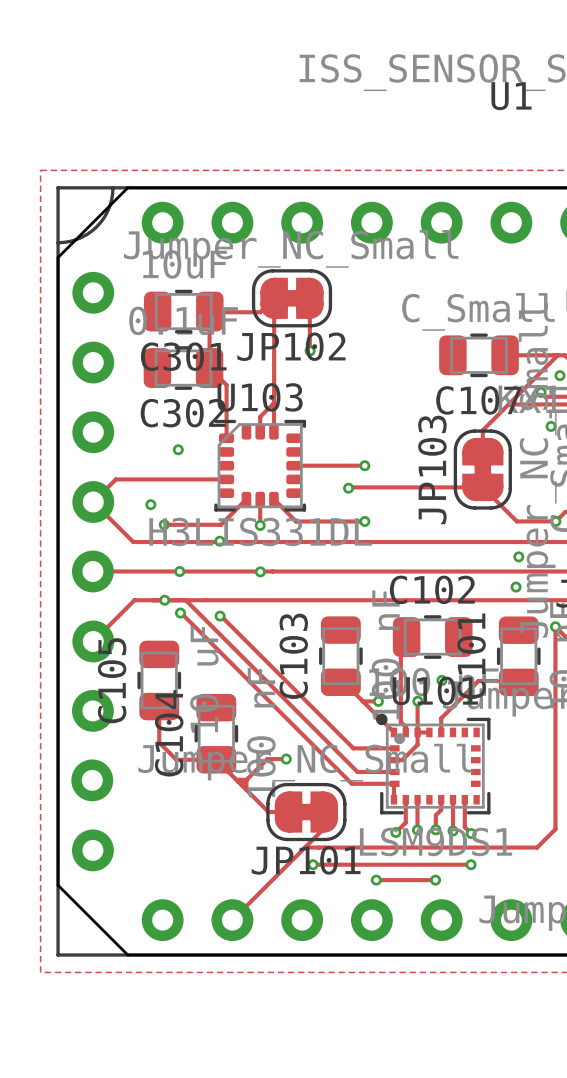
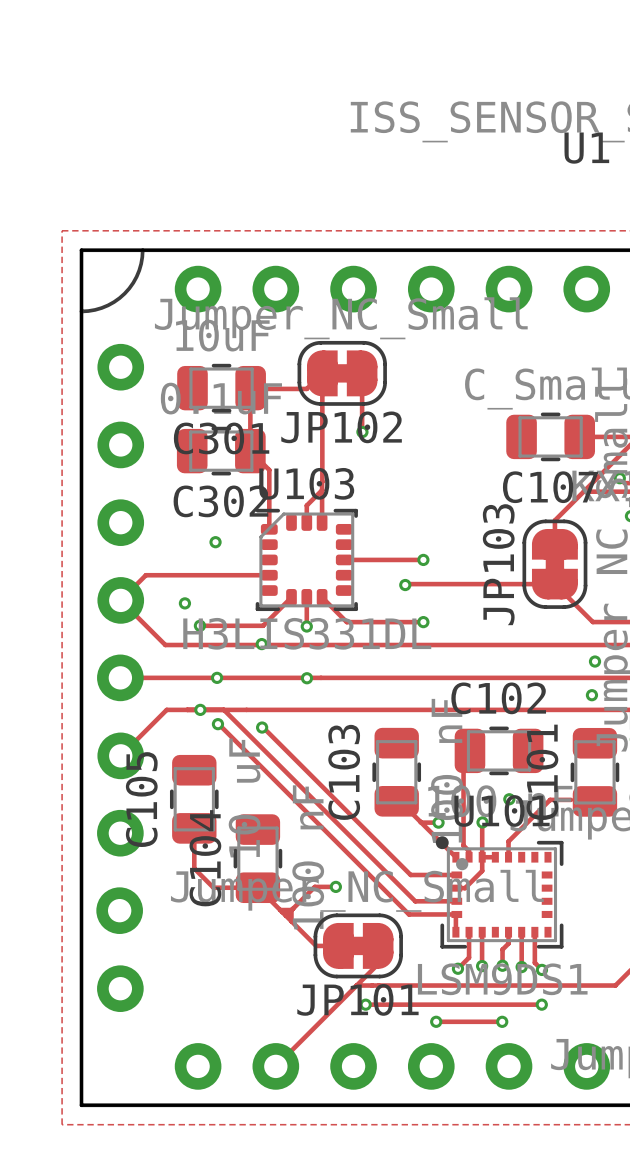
board edge: (127, 187) (58, 257) -> (159, 250) (81, 250) (81, 327)
board edge: (58, 885) (127, 955) -> (81, 1027) (81, 1105) (159, 1105)

